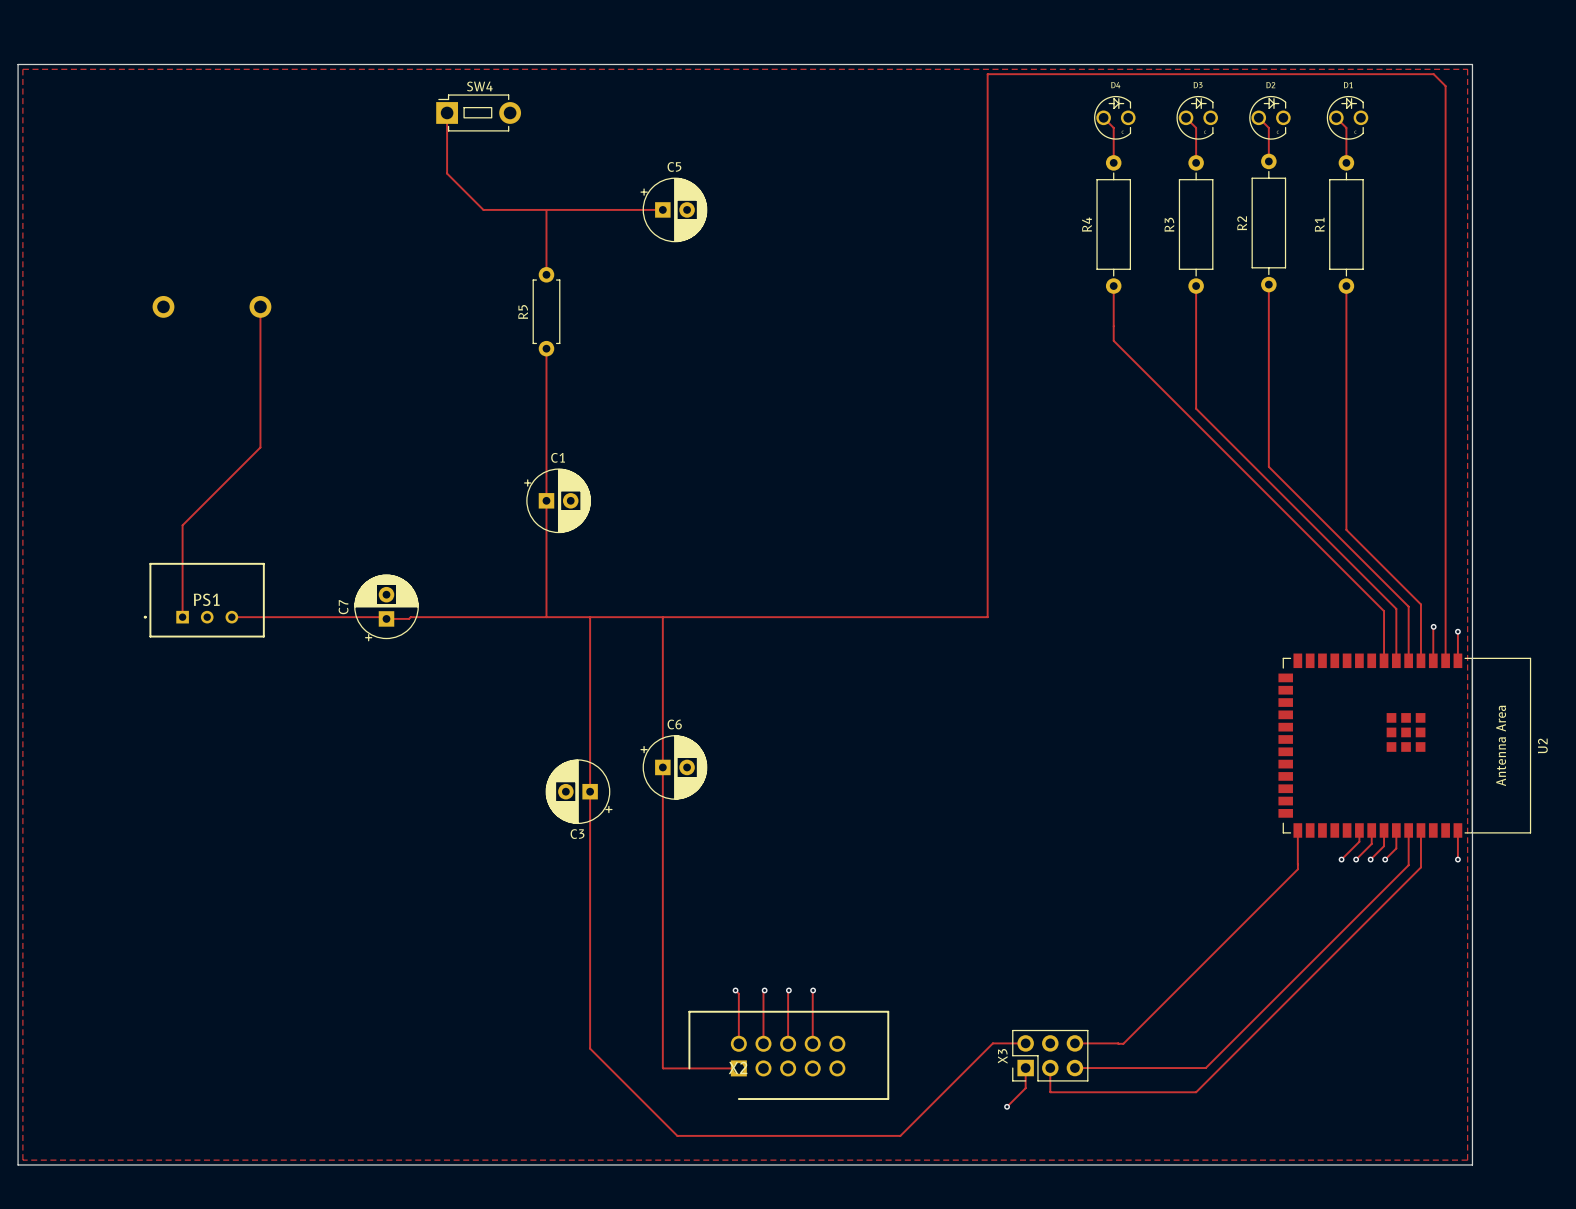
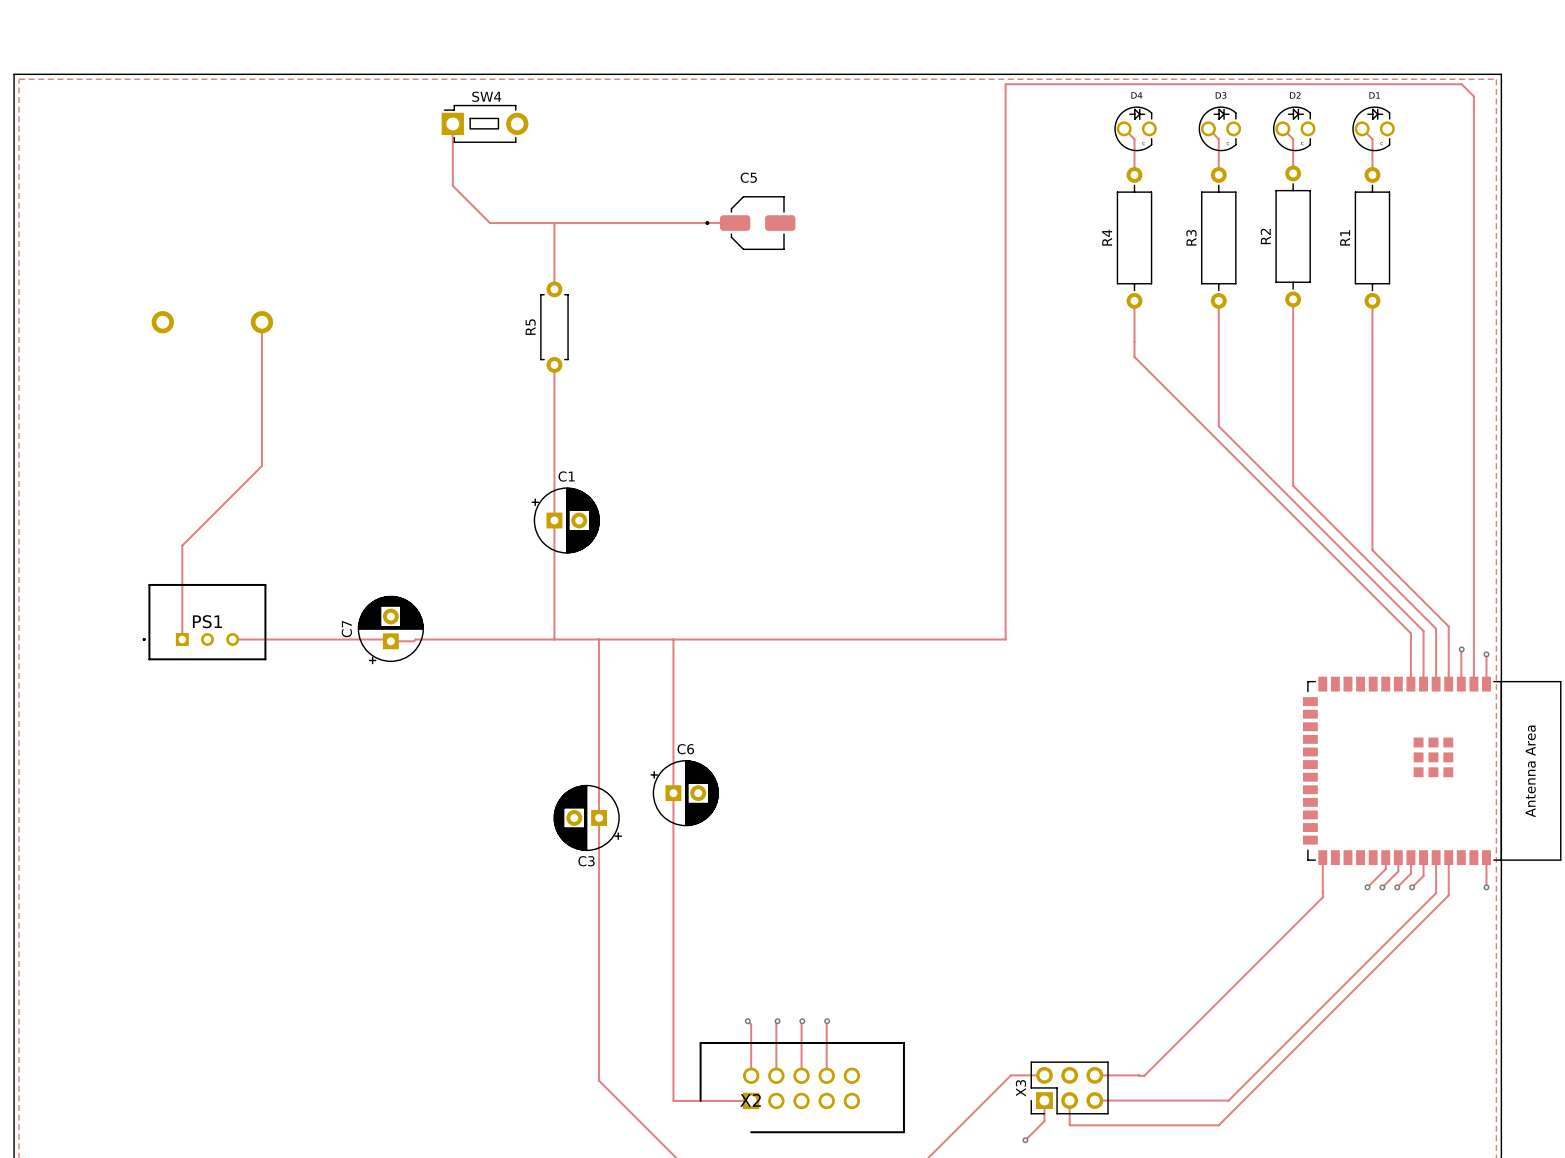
C5 footprint: [640, 177, 708, 243] -> [705, 196, 796, 250]
track: none -> (673, 223) (735, 223)

